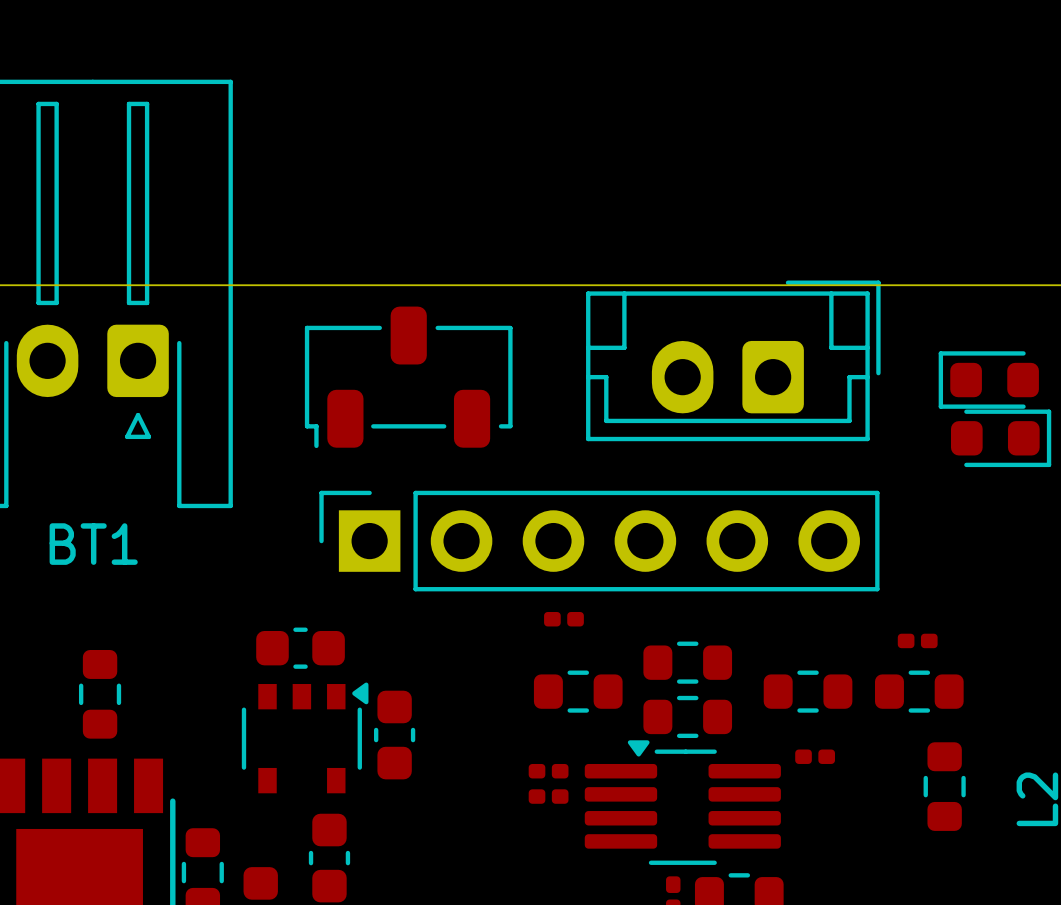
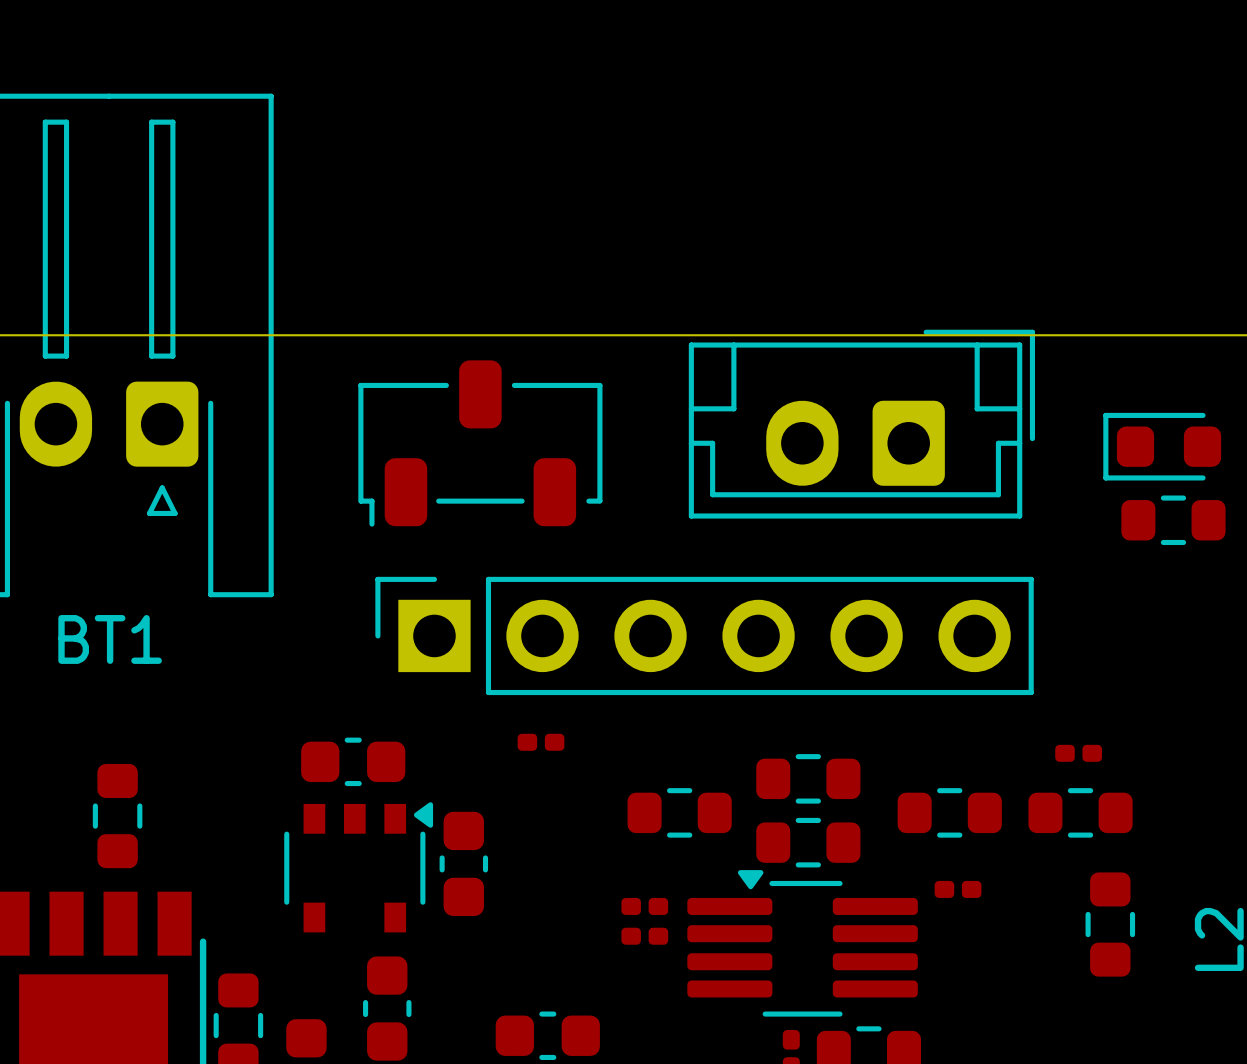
part footprint: [950, 409, 1052, 468] -> [1121, 495, 1226, 546]
part position: (563, 619) -> (541, 742)
part: none -> (547, 1035)

